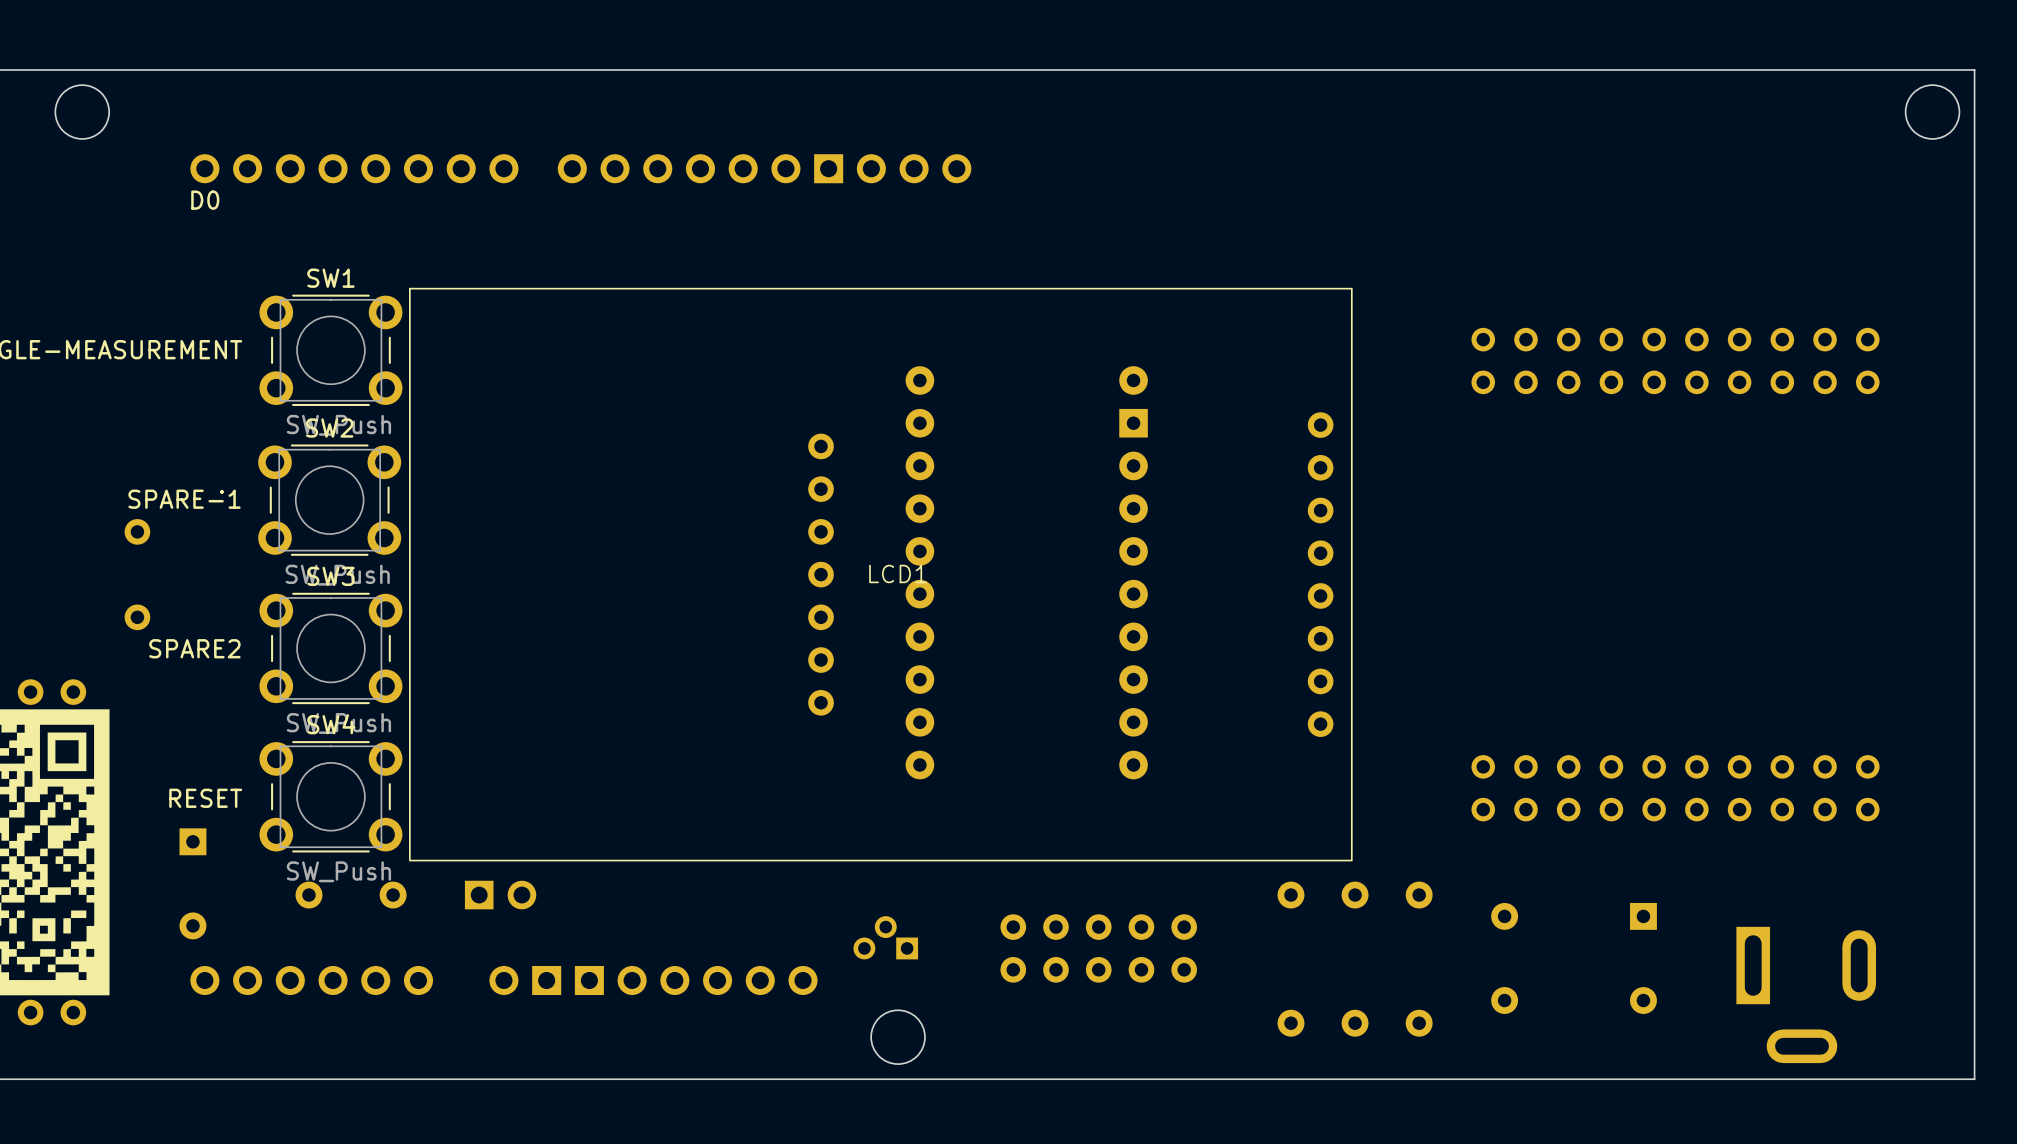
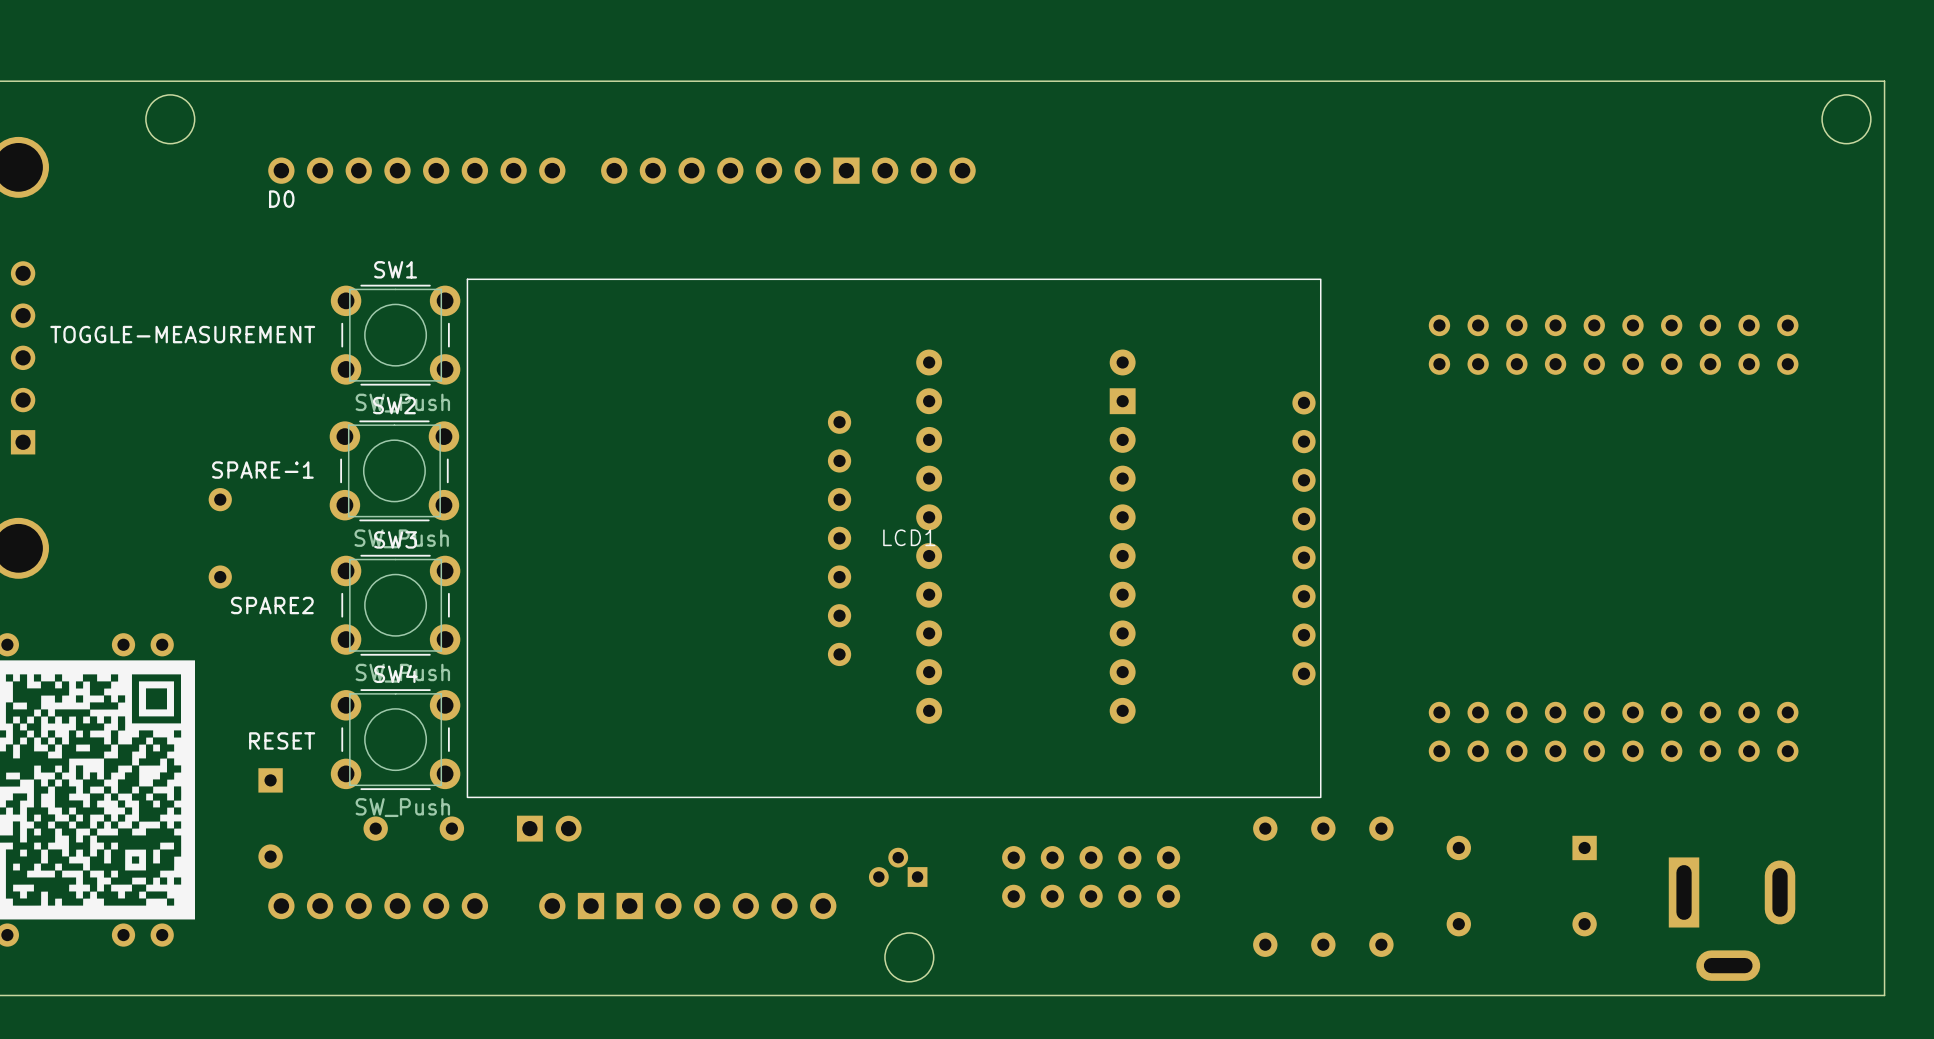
LCD1 footprint: [409, 287, 1353, 862] -> [466, 278, 1322, 799]

